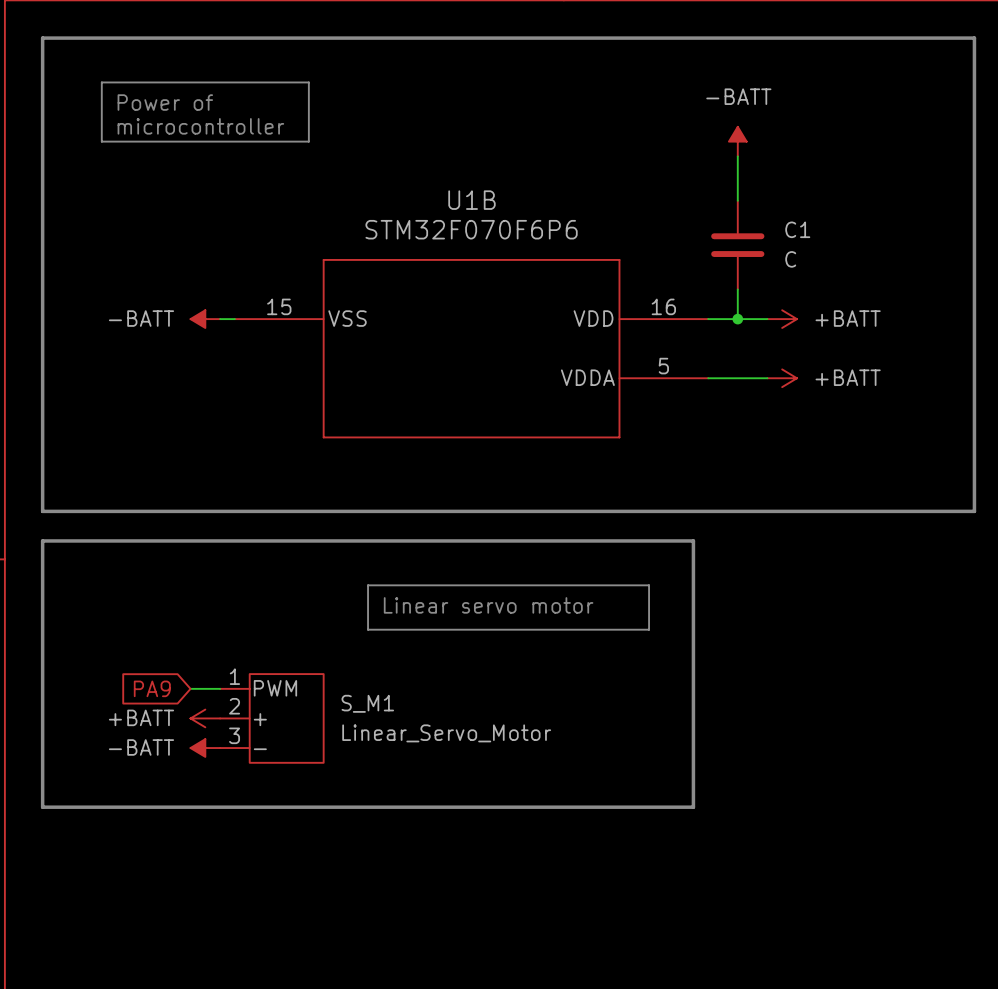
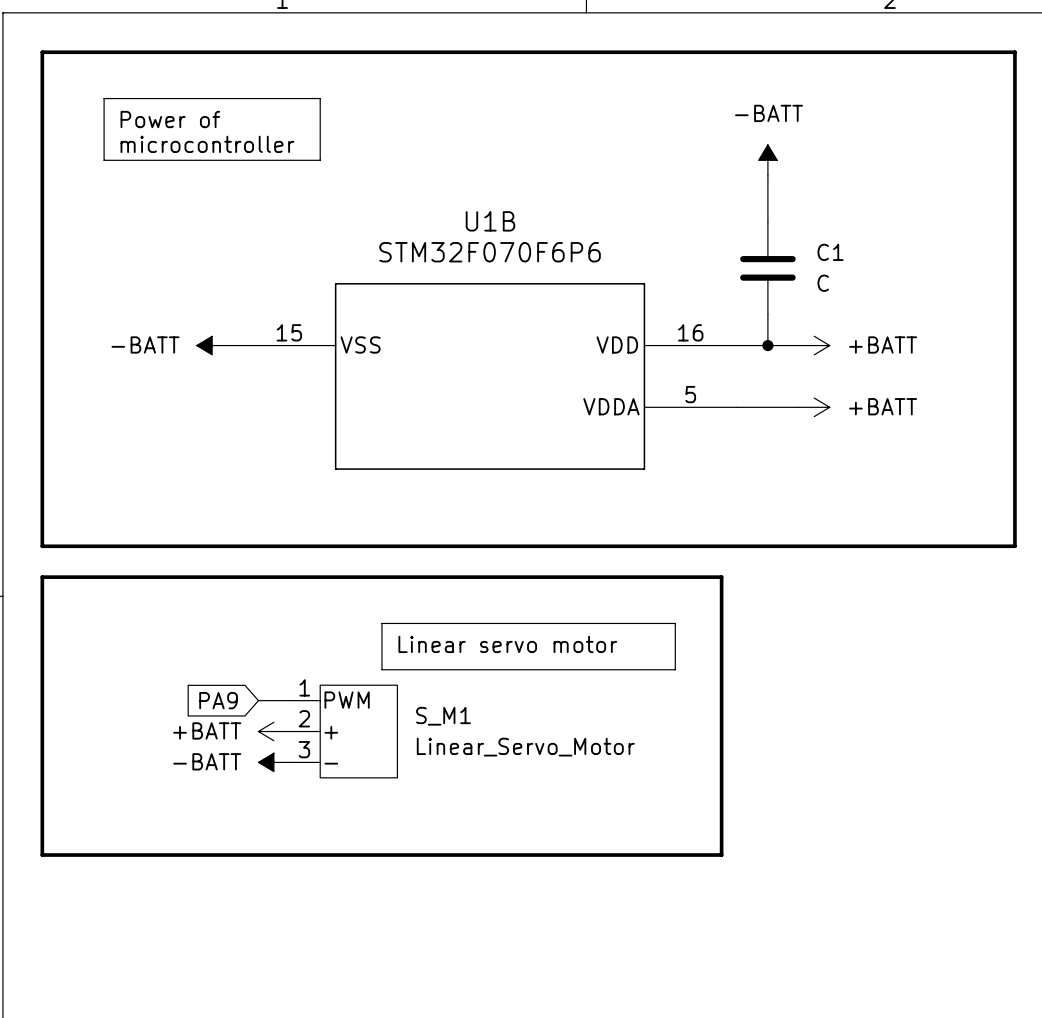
global label position: PA9 (152, 688) -> PA9 (218, 700)
wire: (190, 688) (220, 688) -> (258, 700) (289, 700)
power symbol position: +BATT (205, 718) -> +BATT (273, 731)
S_M1 position: (271, 718) -> (343, 731)
power symbol position: -BATT (205, 748) -> -BATT (273, 762)

